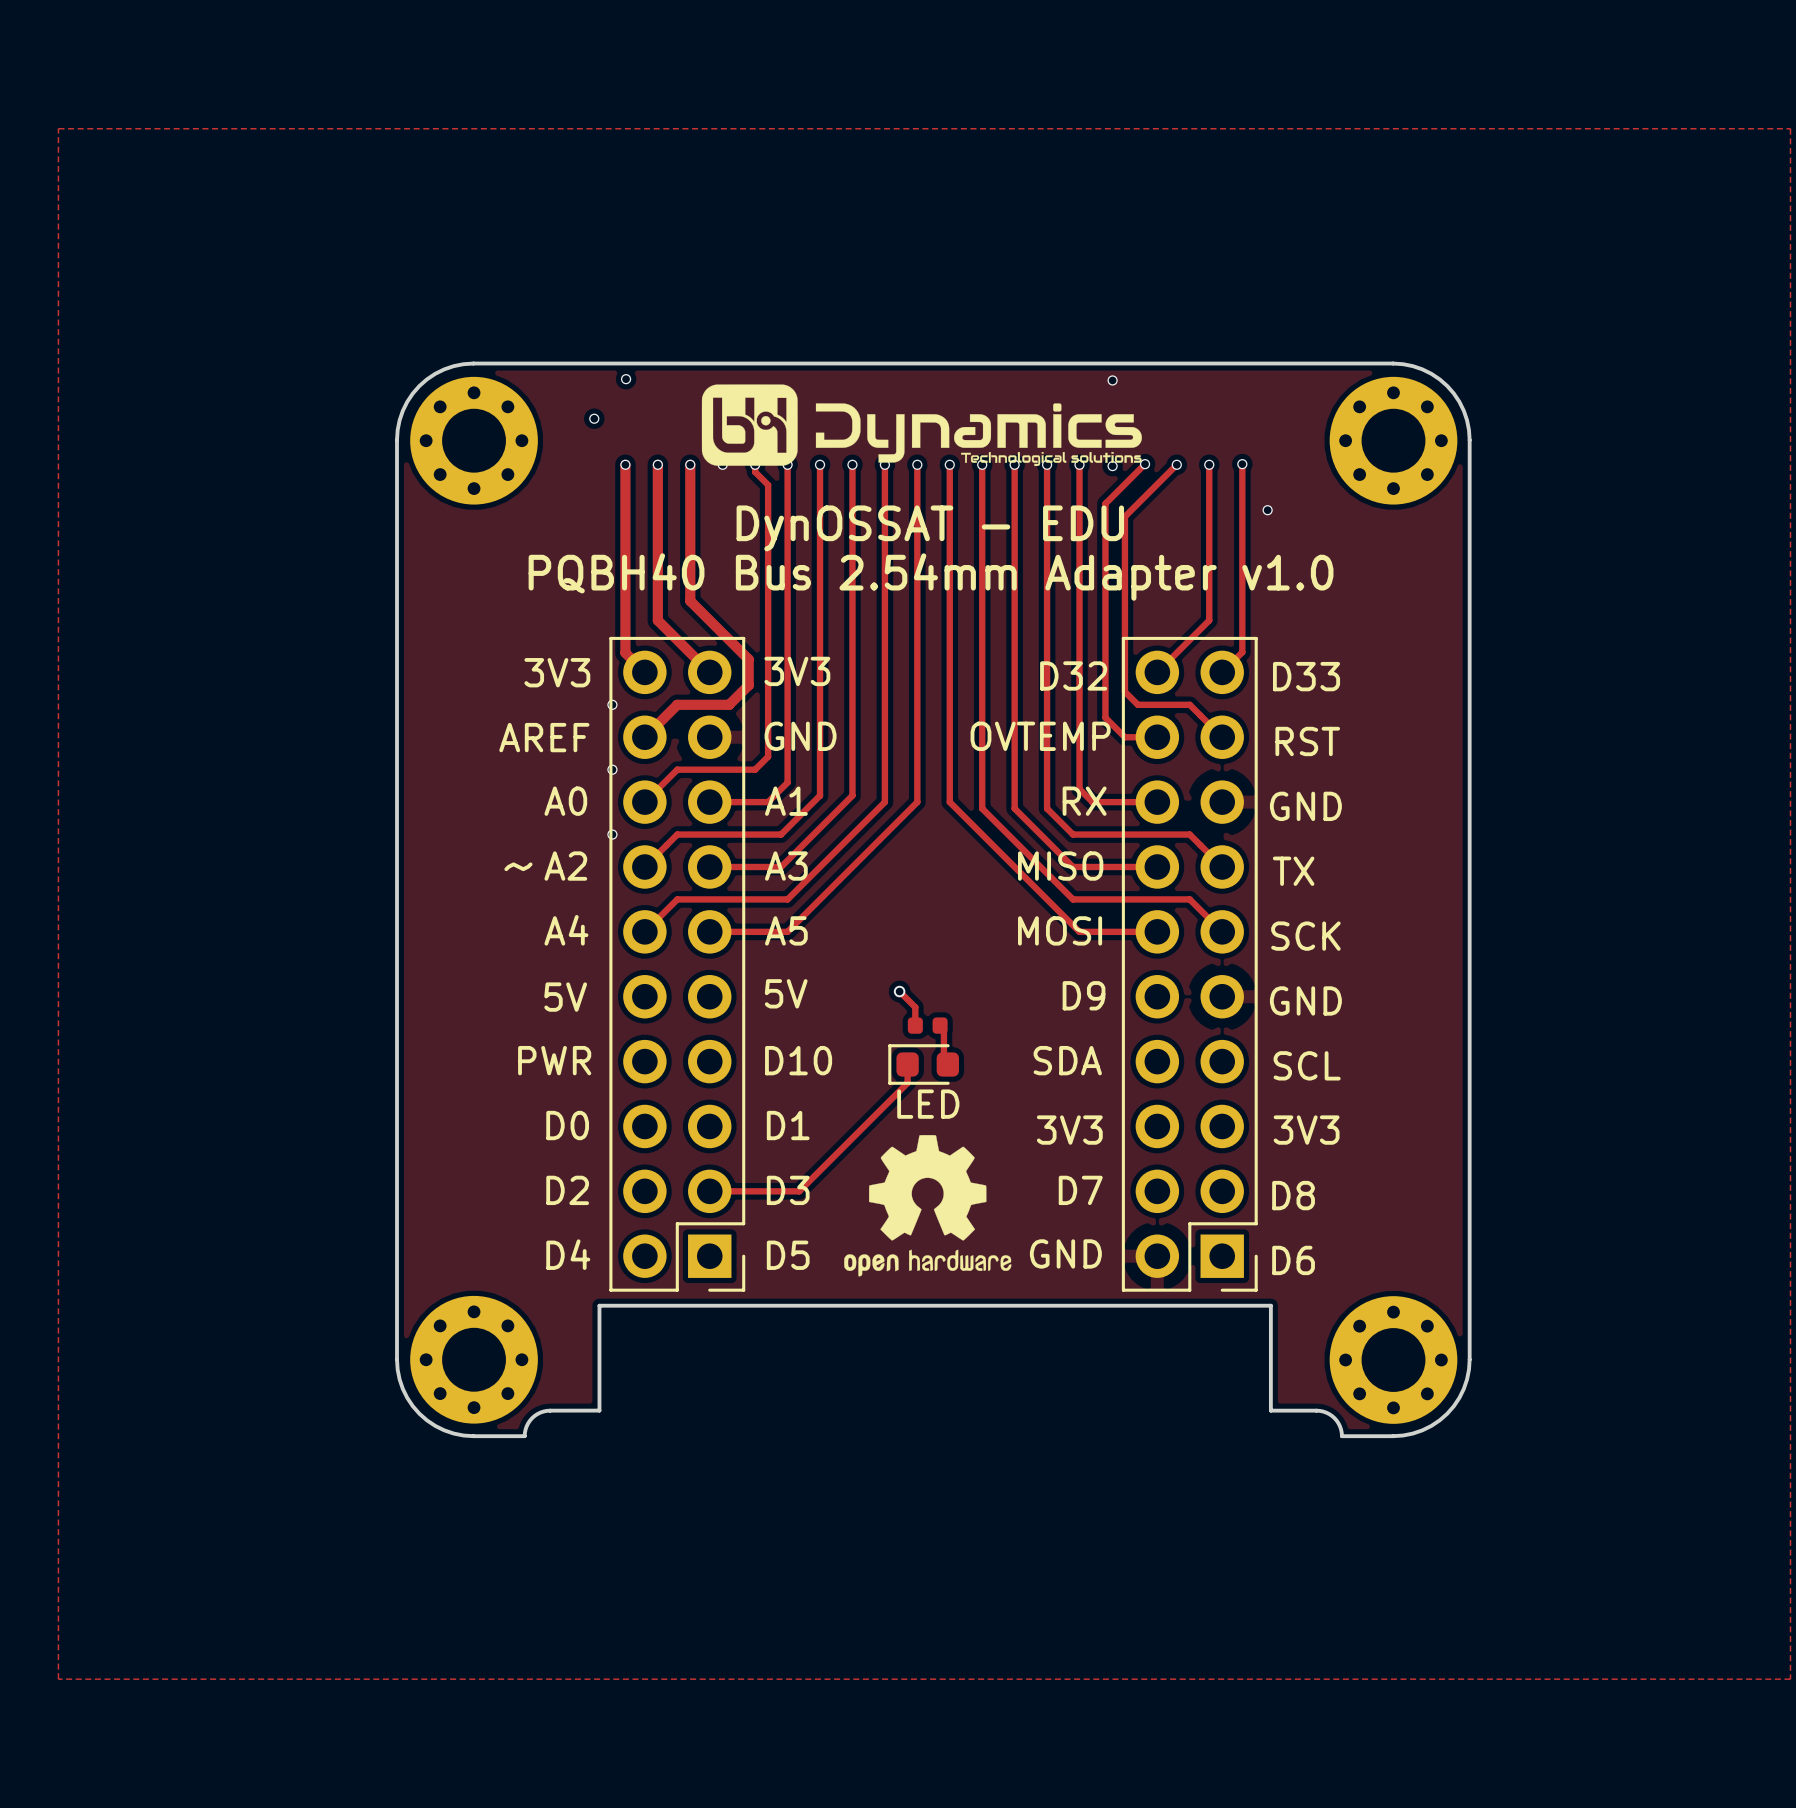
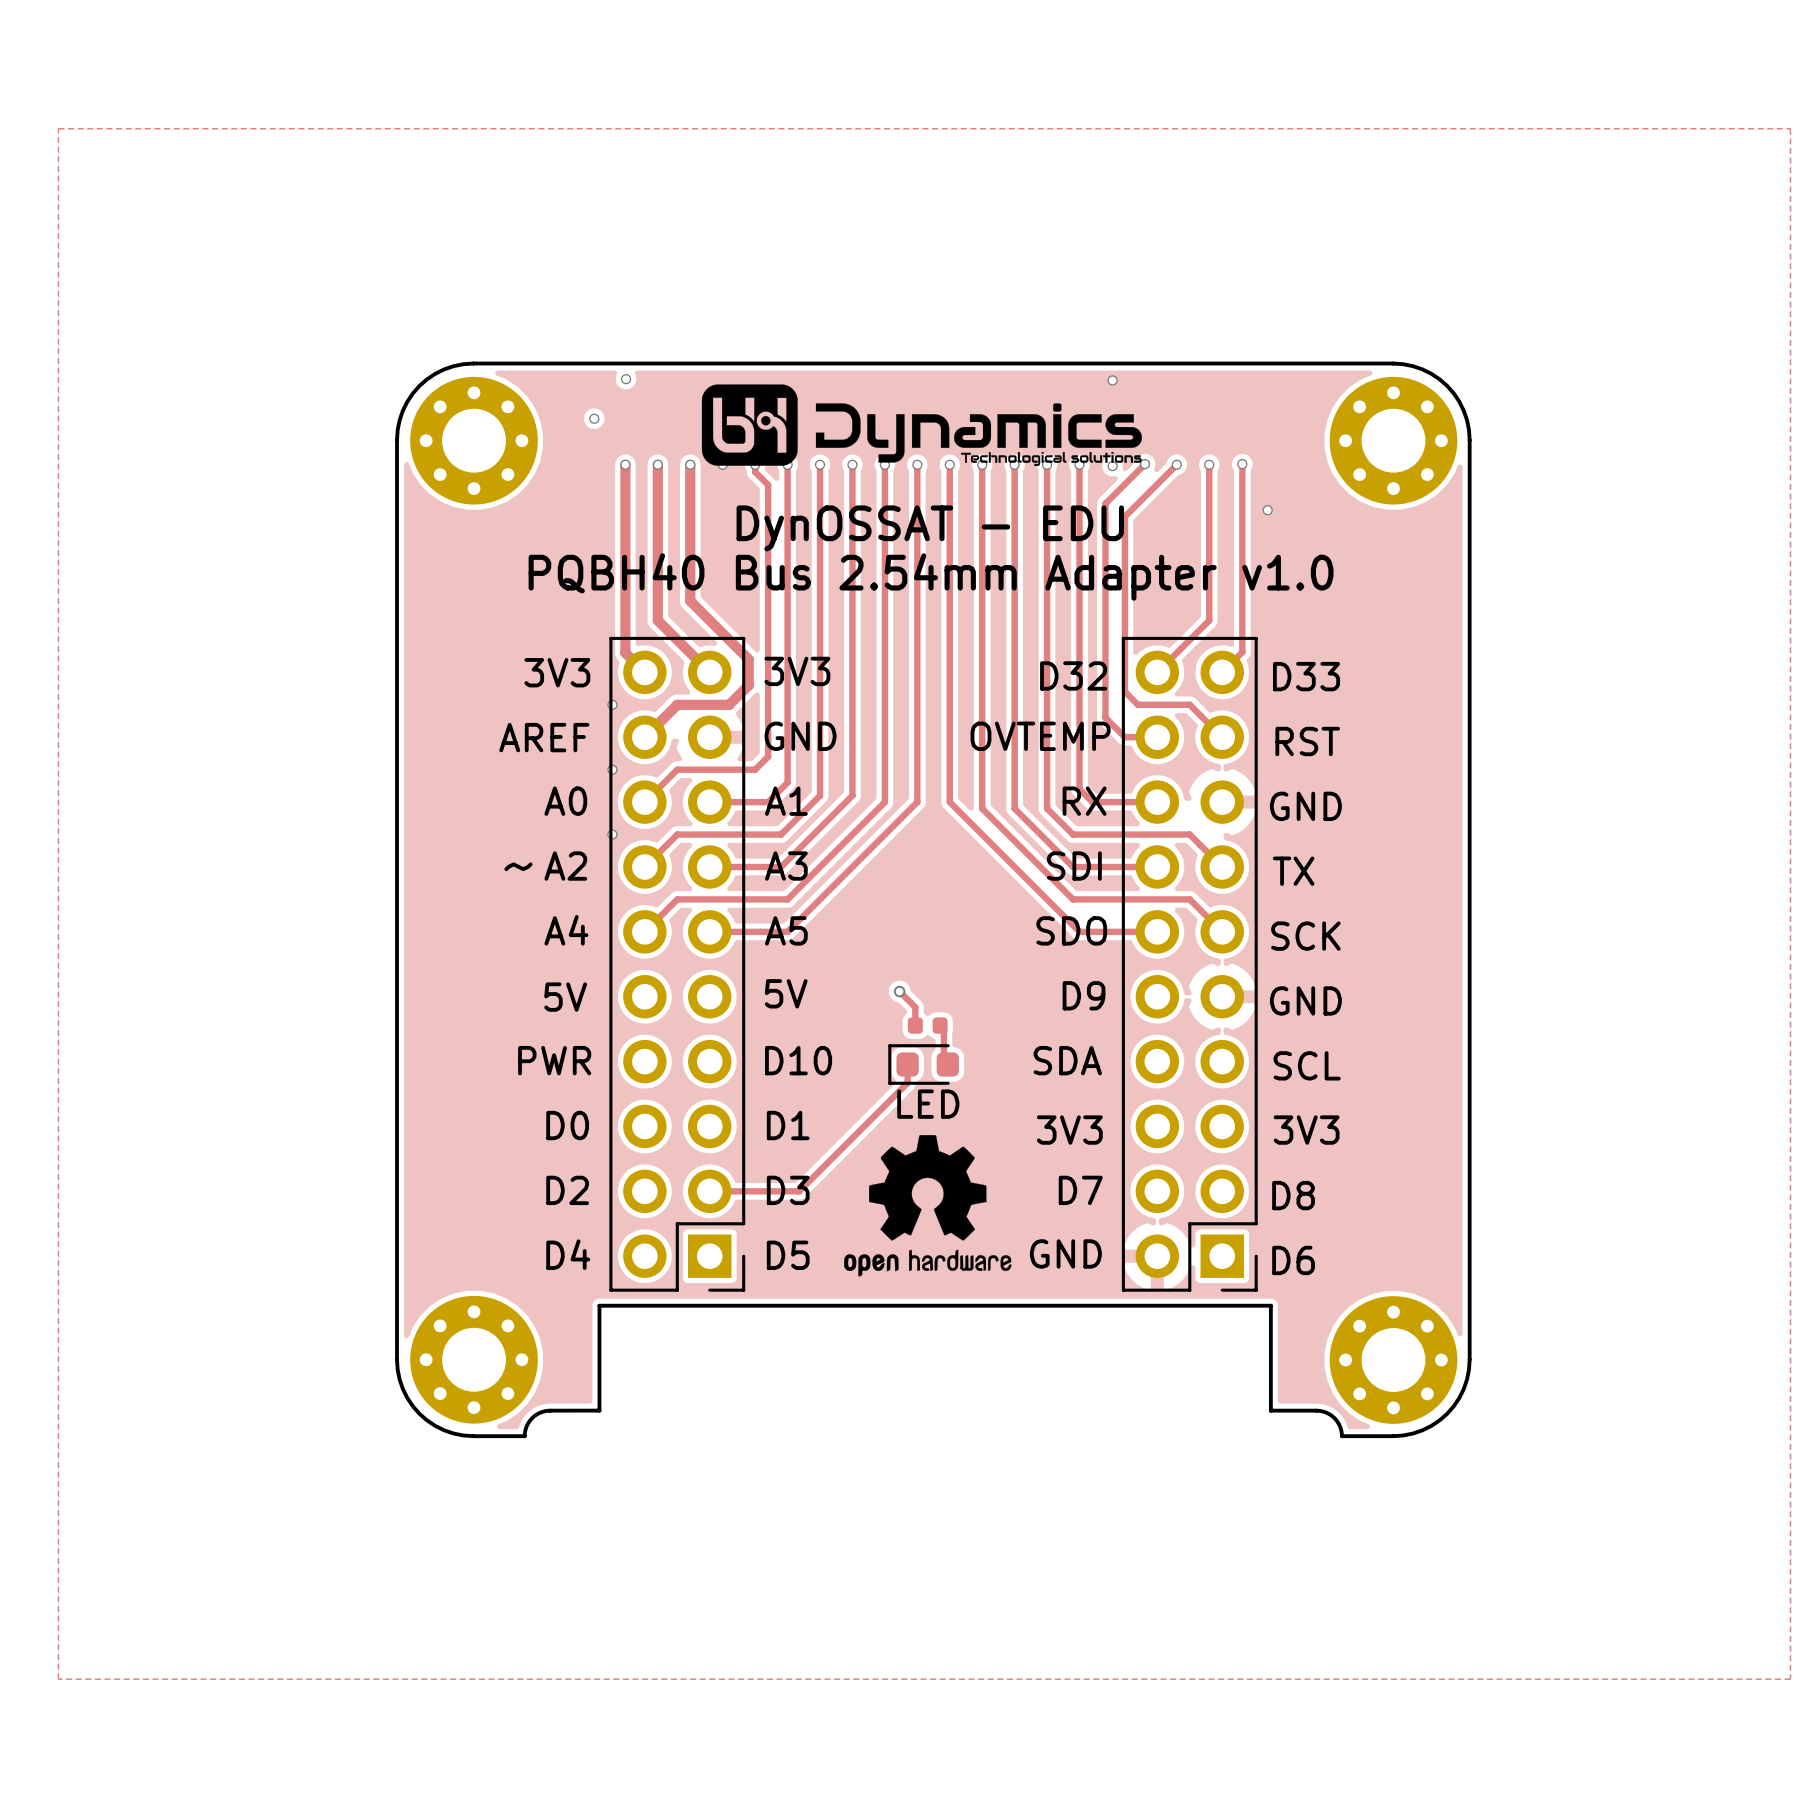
text: MISO (1060, 866) -> SDI (1074, 866)
text: MOSI (1060, 930) -> SDO (1071, 930)

